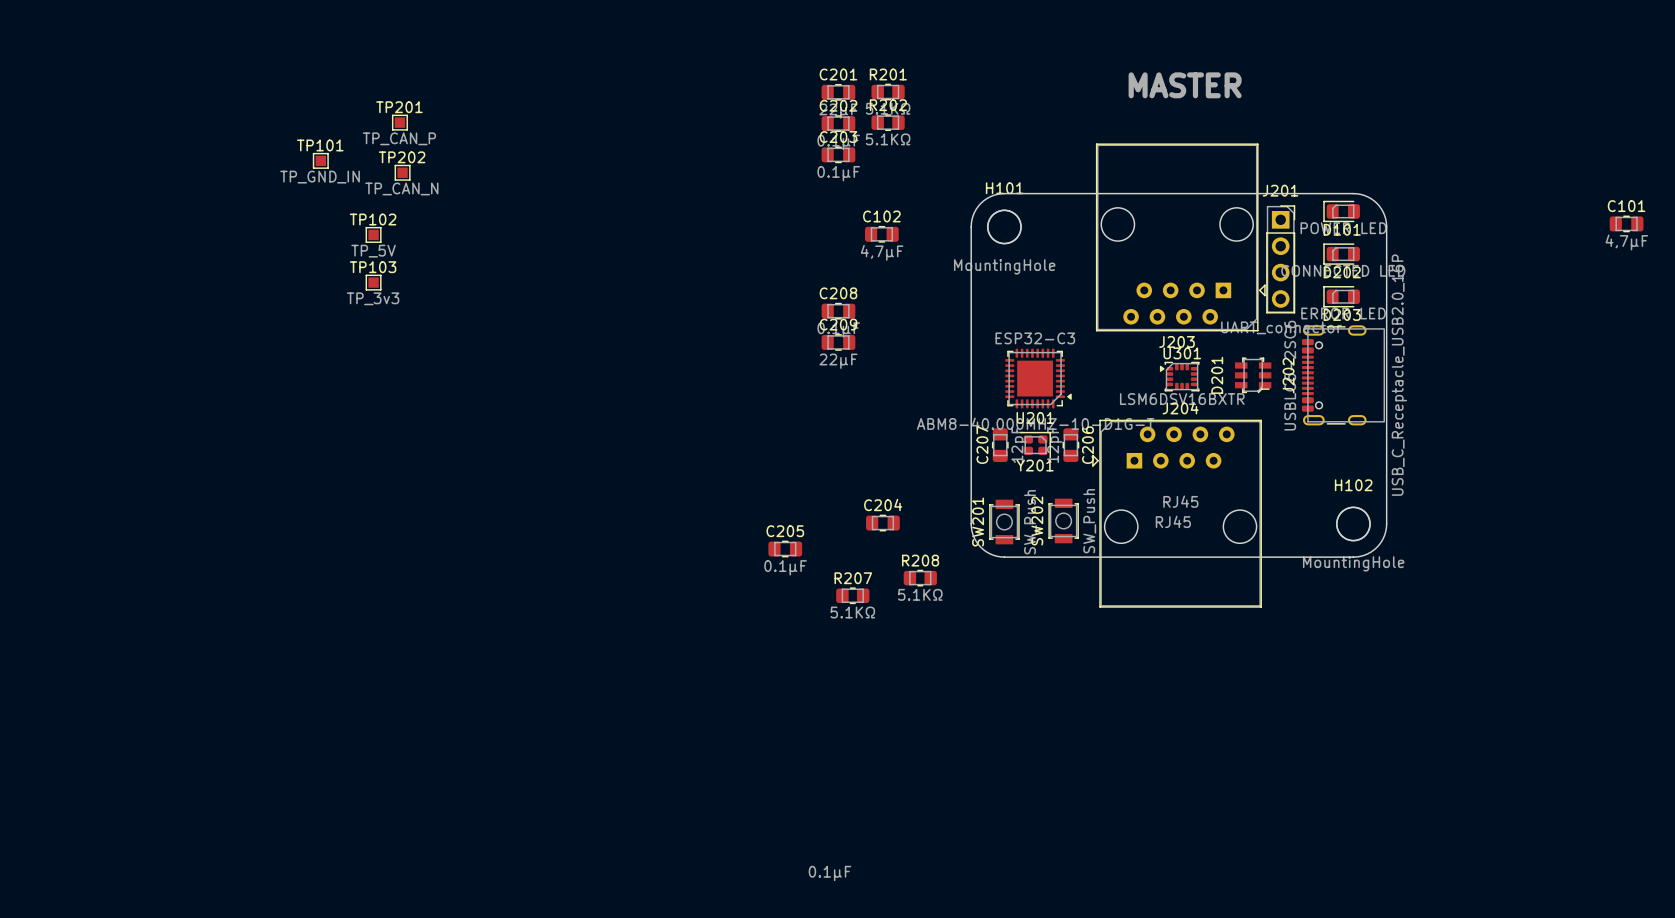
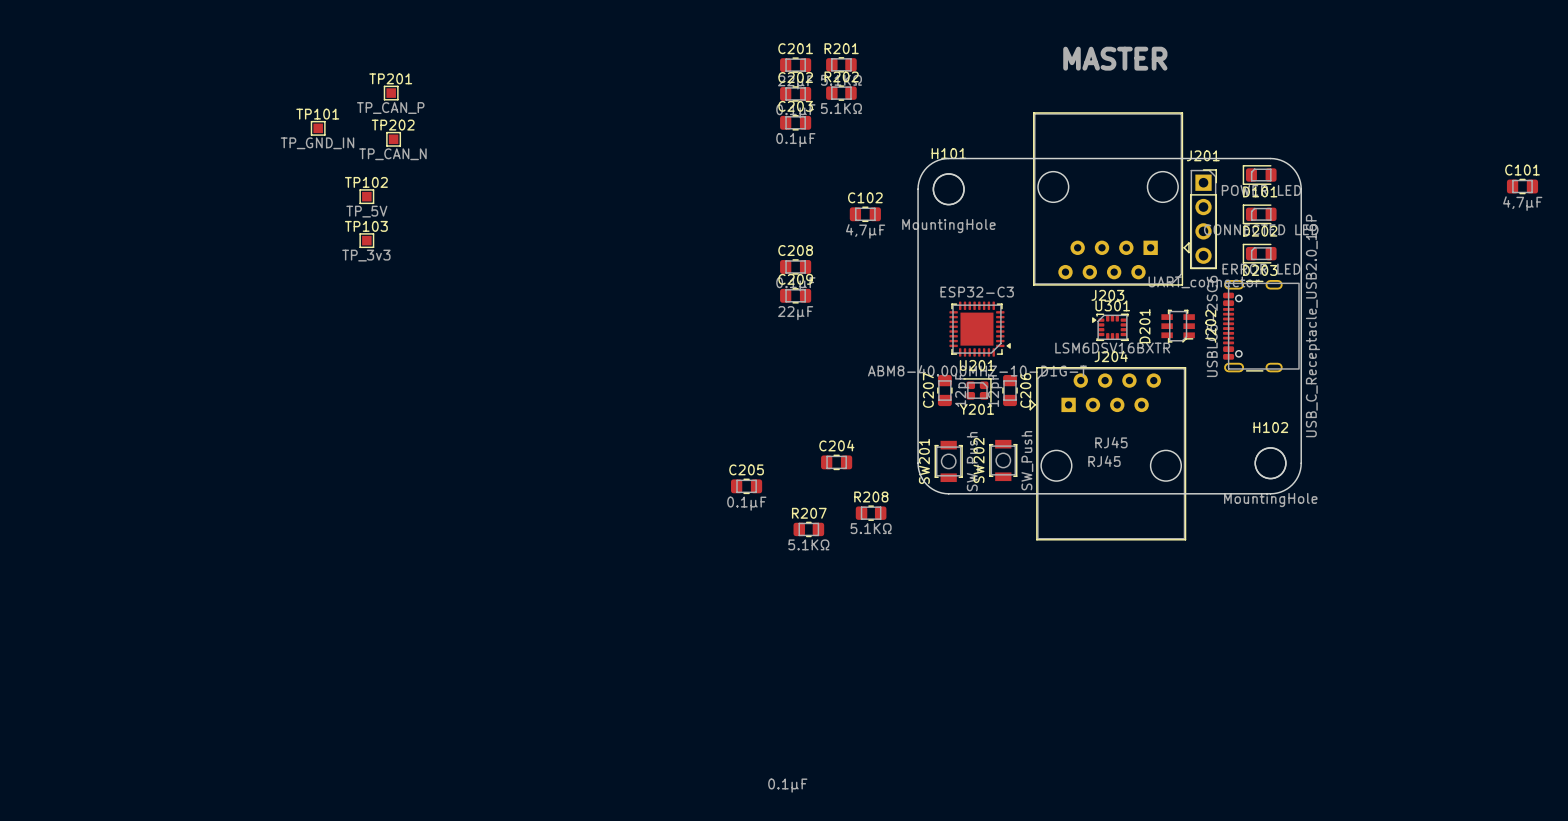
C102 position: (881, 234) -> (865, 214)

